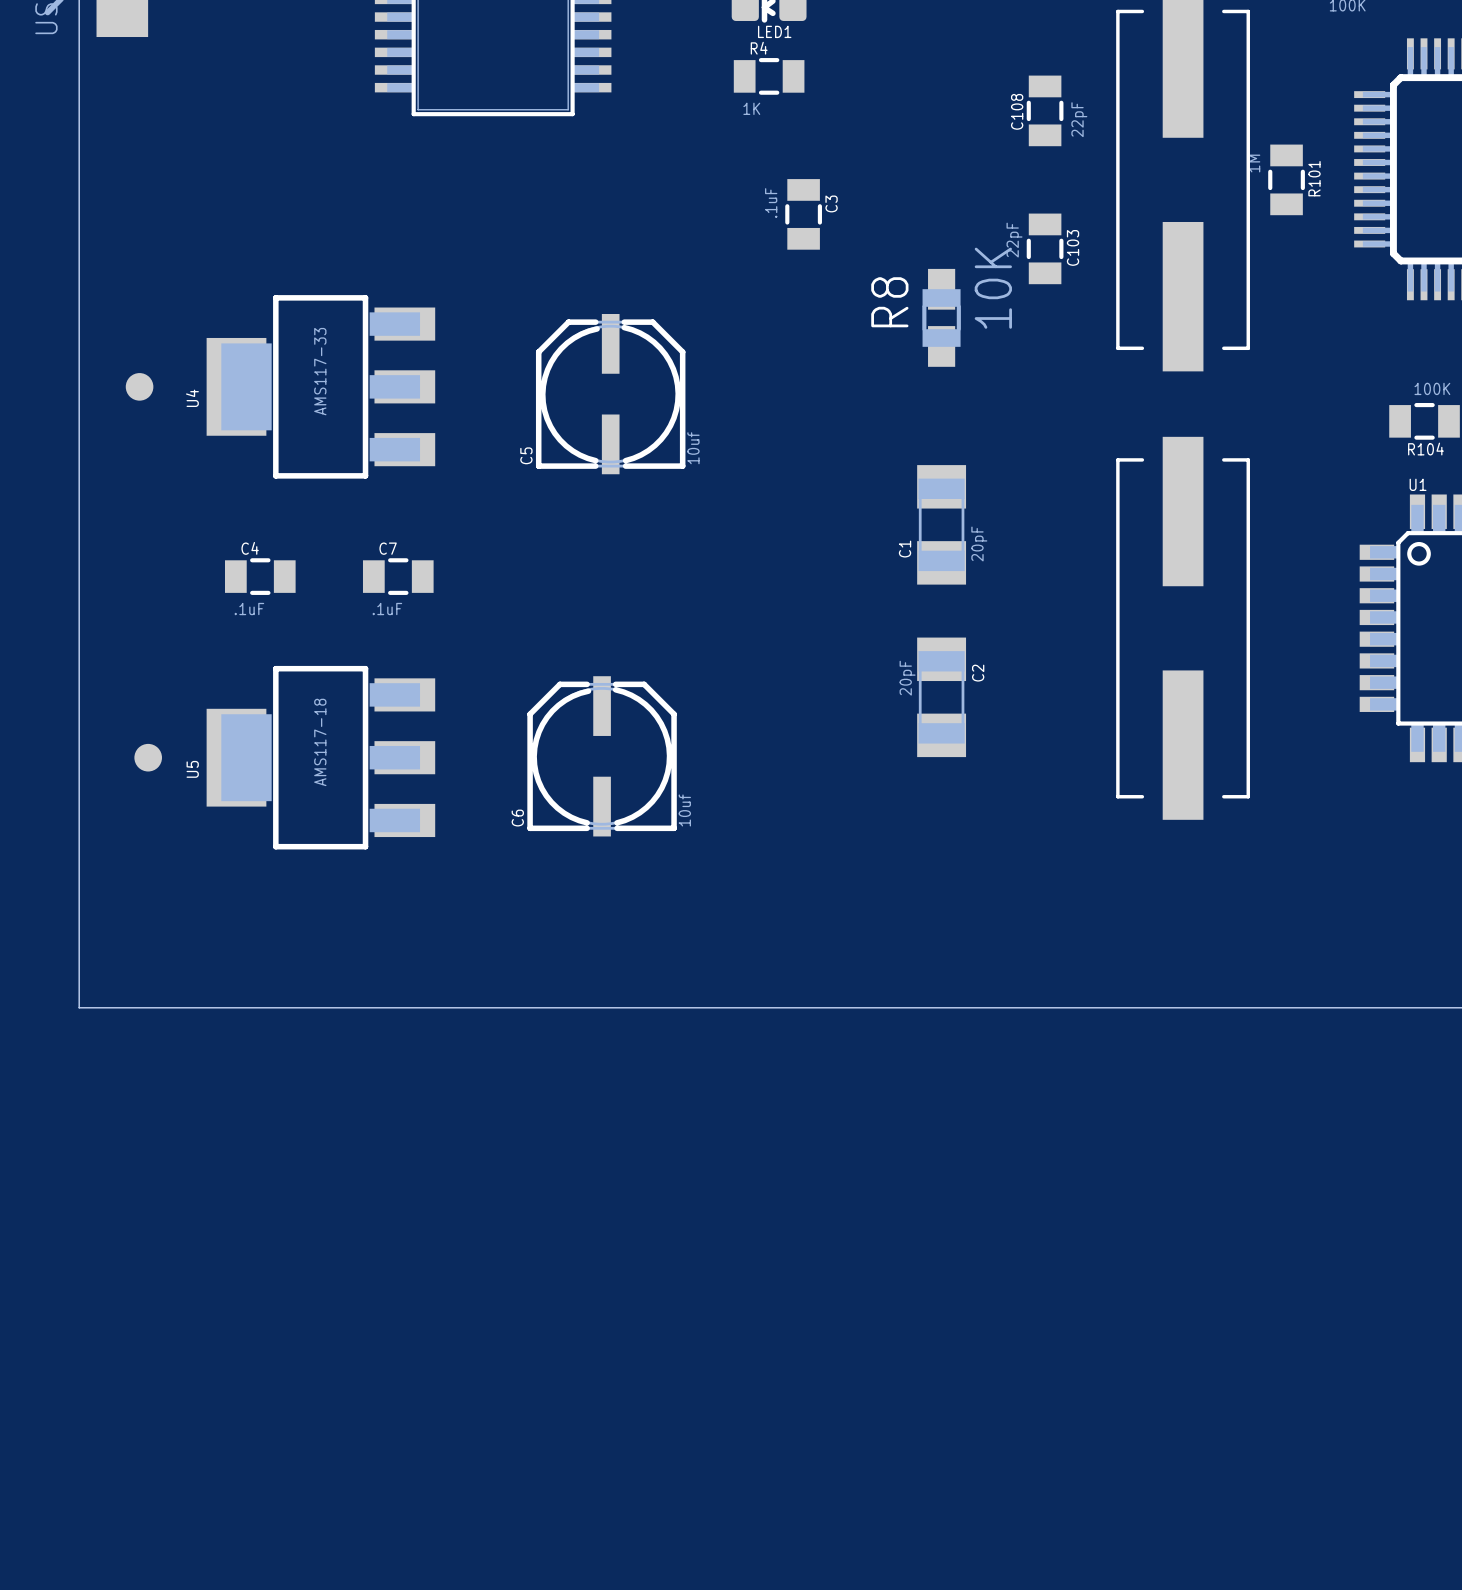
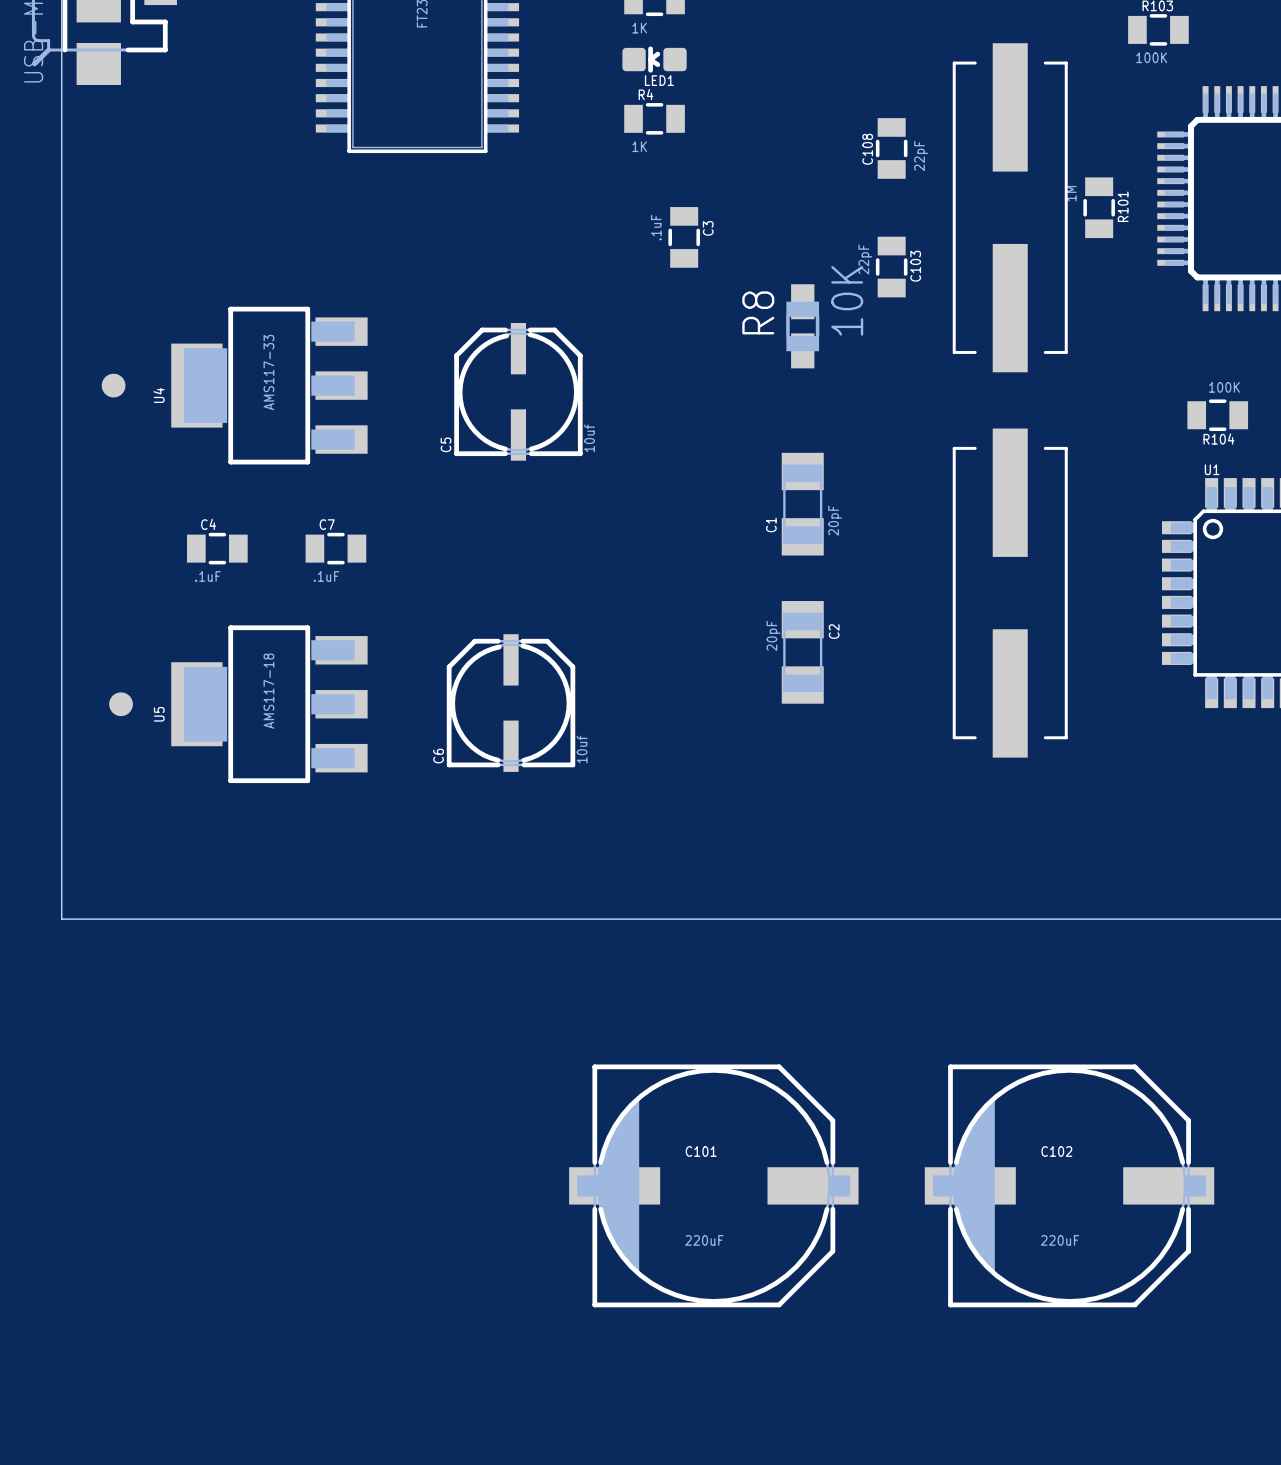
C101: none -> 220uF (713, 1185)
C102: none -> 220uF (1069, 1185)

